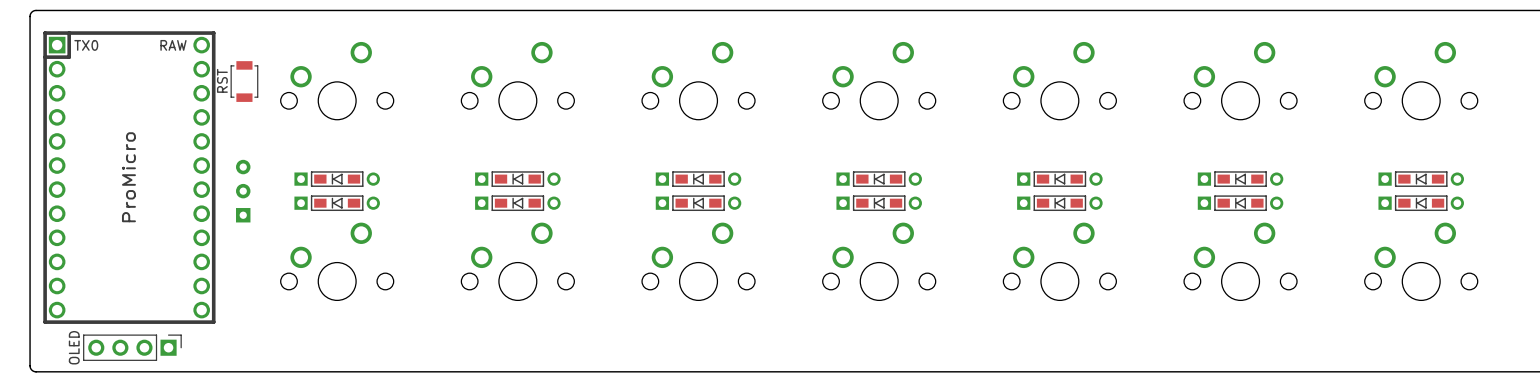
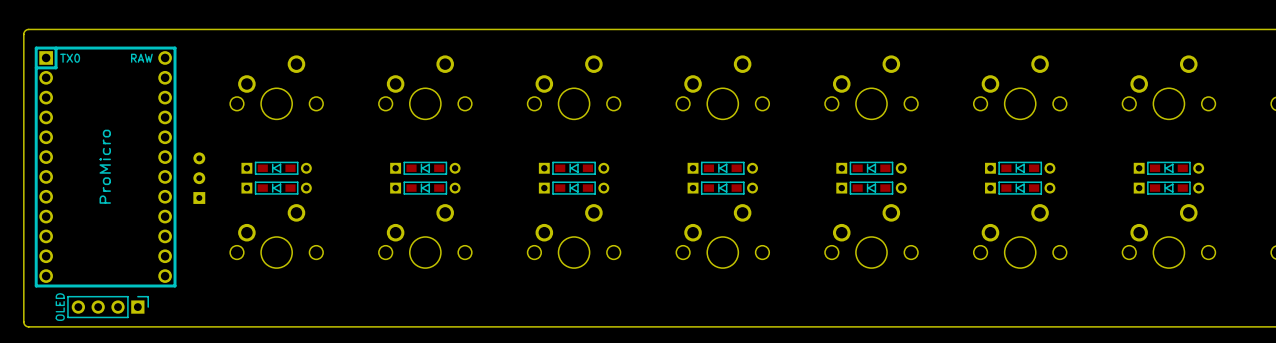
RST: (244, 81) -> none

